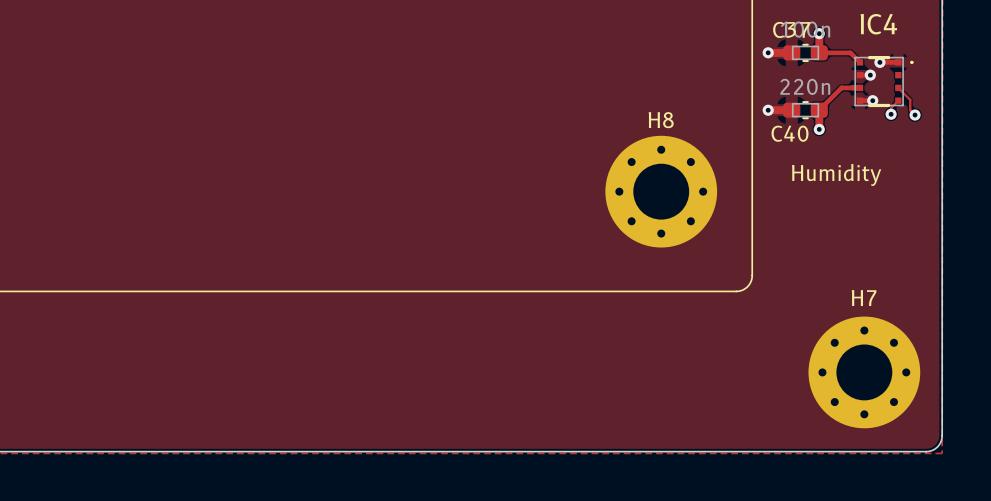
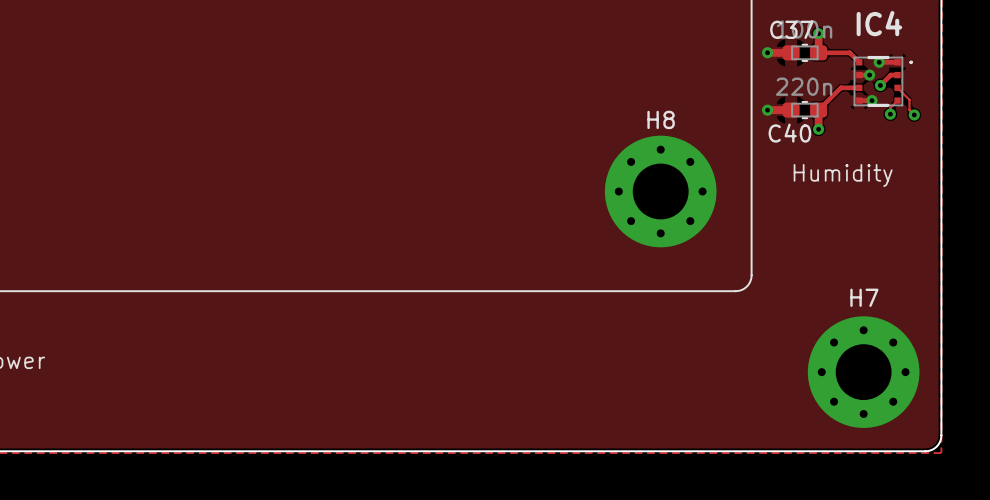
track: none -> (897, 75) (890, 75) (880, 85)
via: none -> (880, 85)

